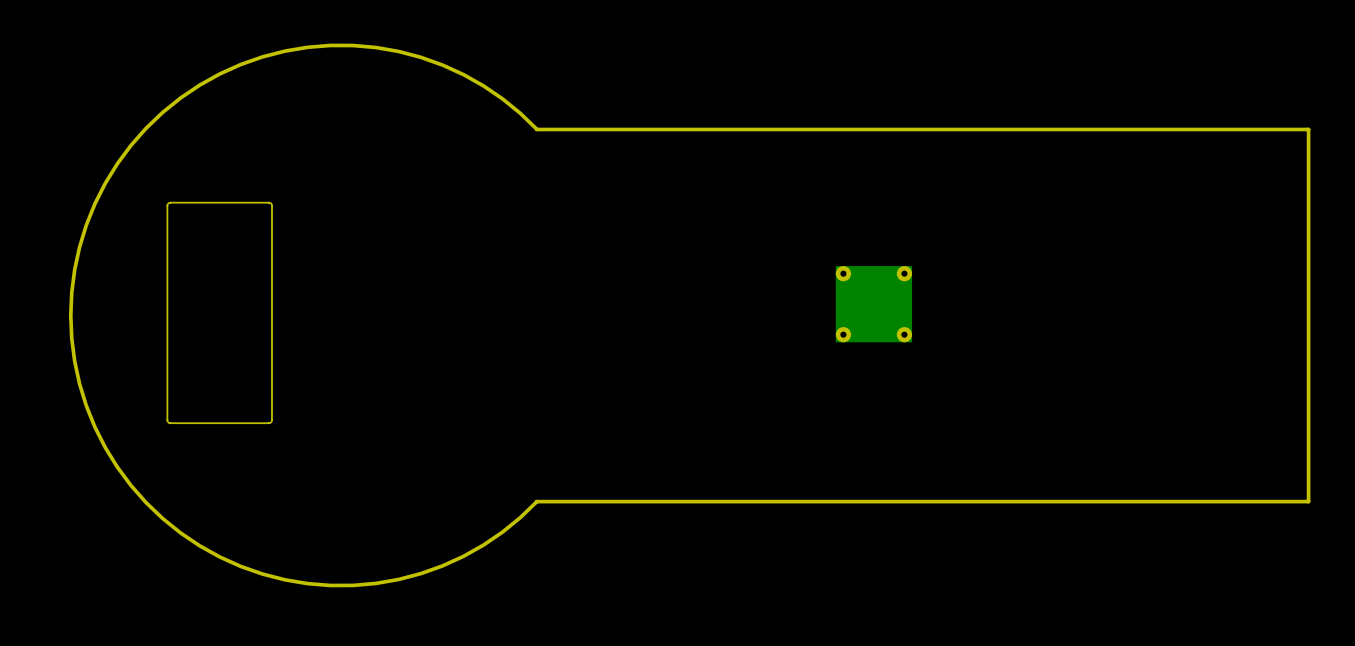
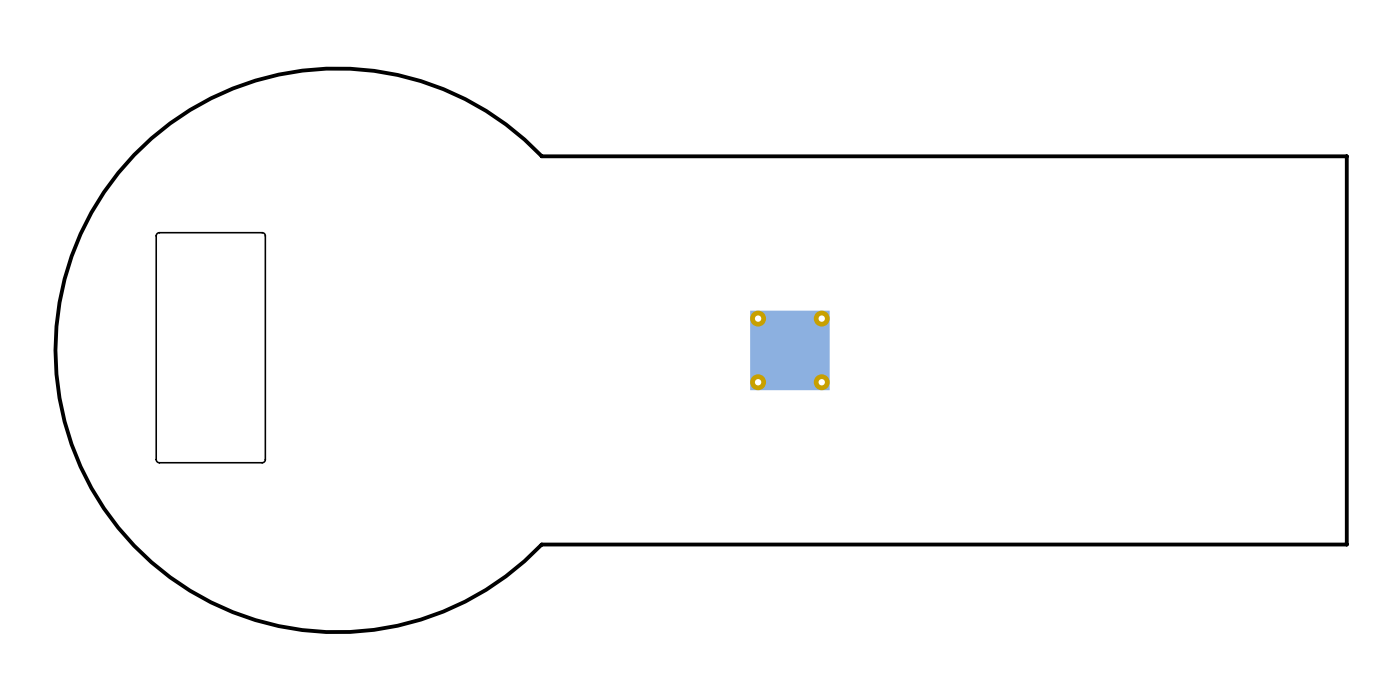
part position: (873, 304) -> (789, 350)

